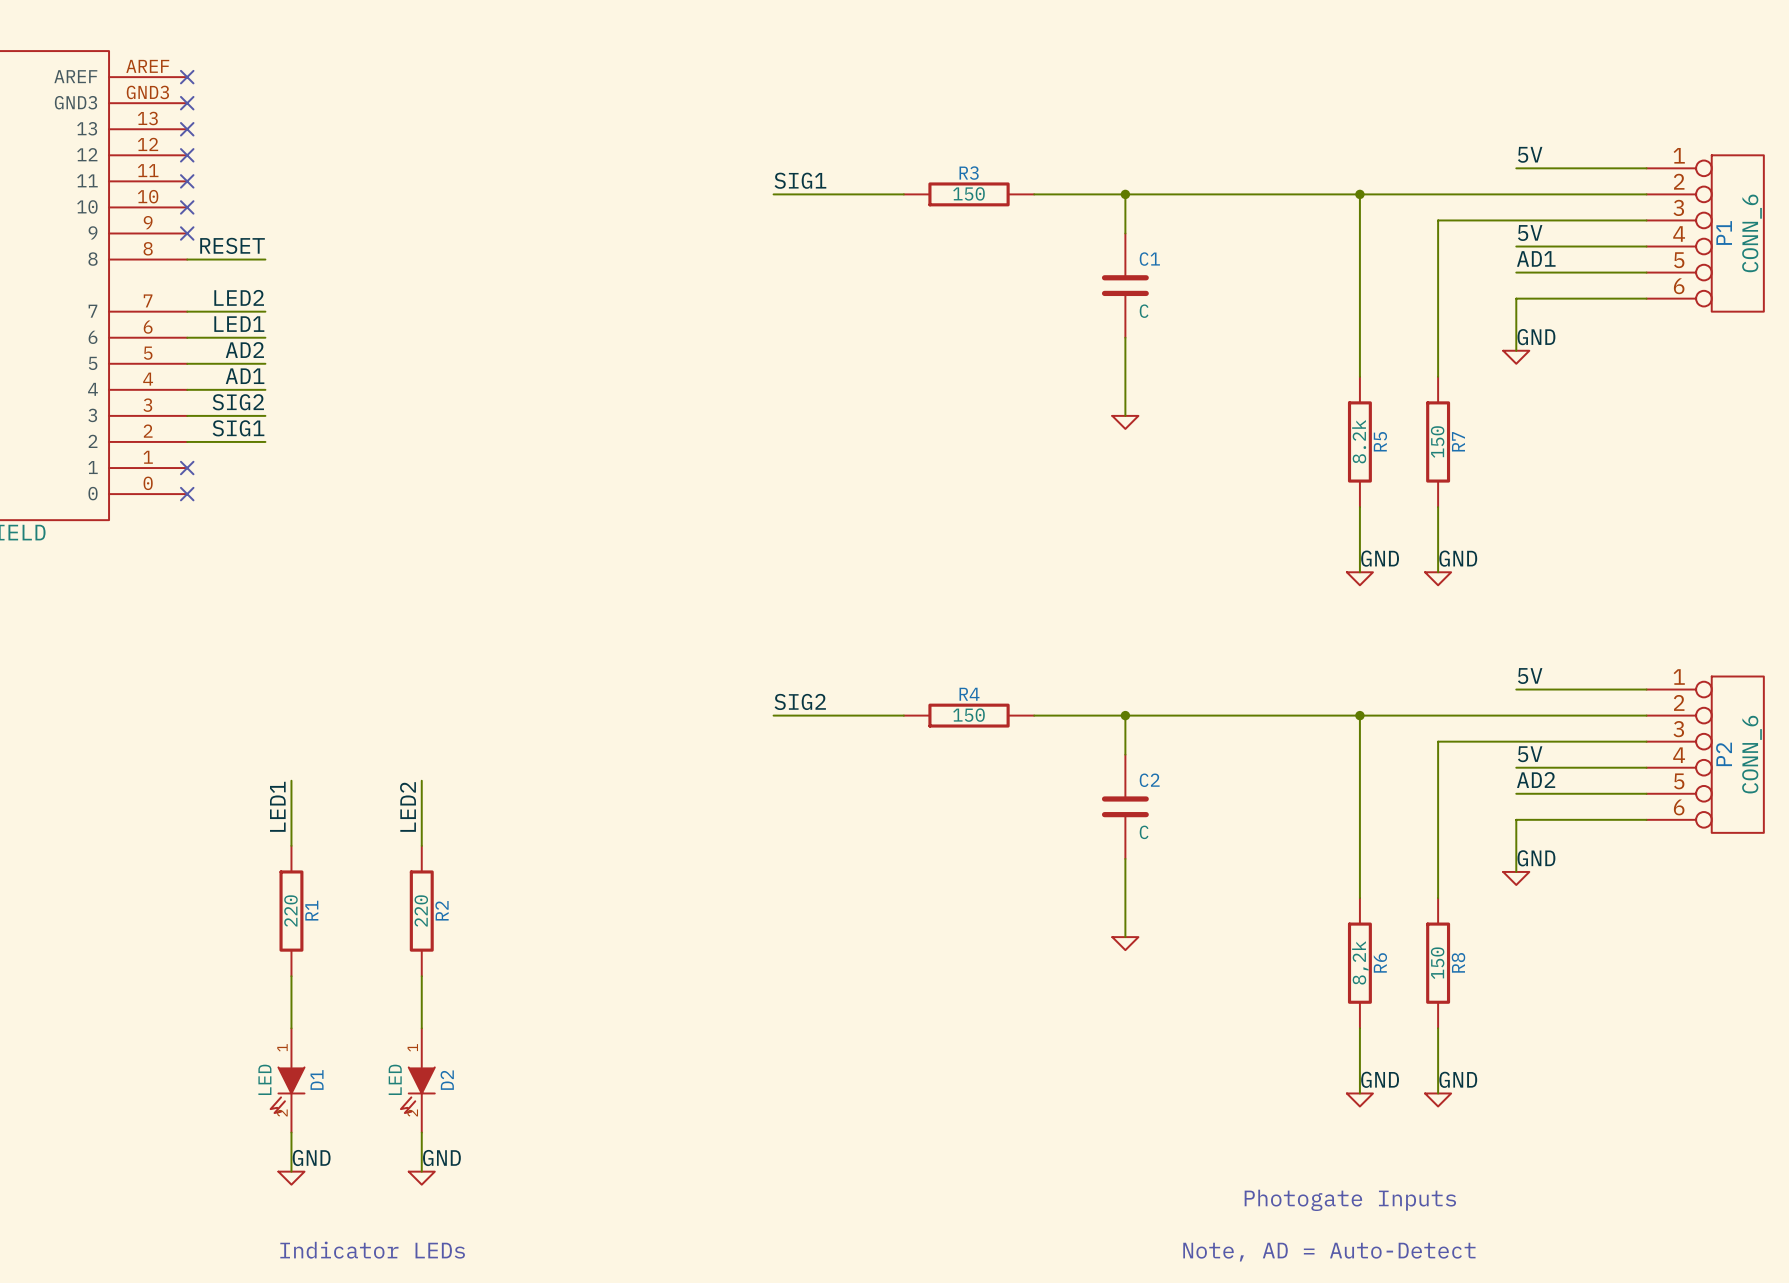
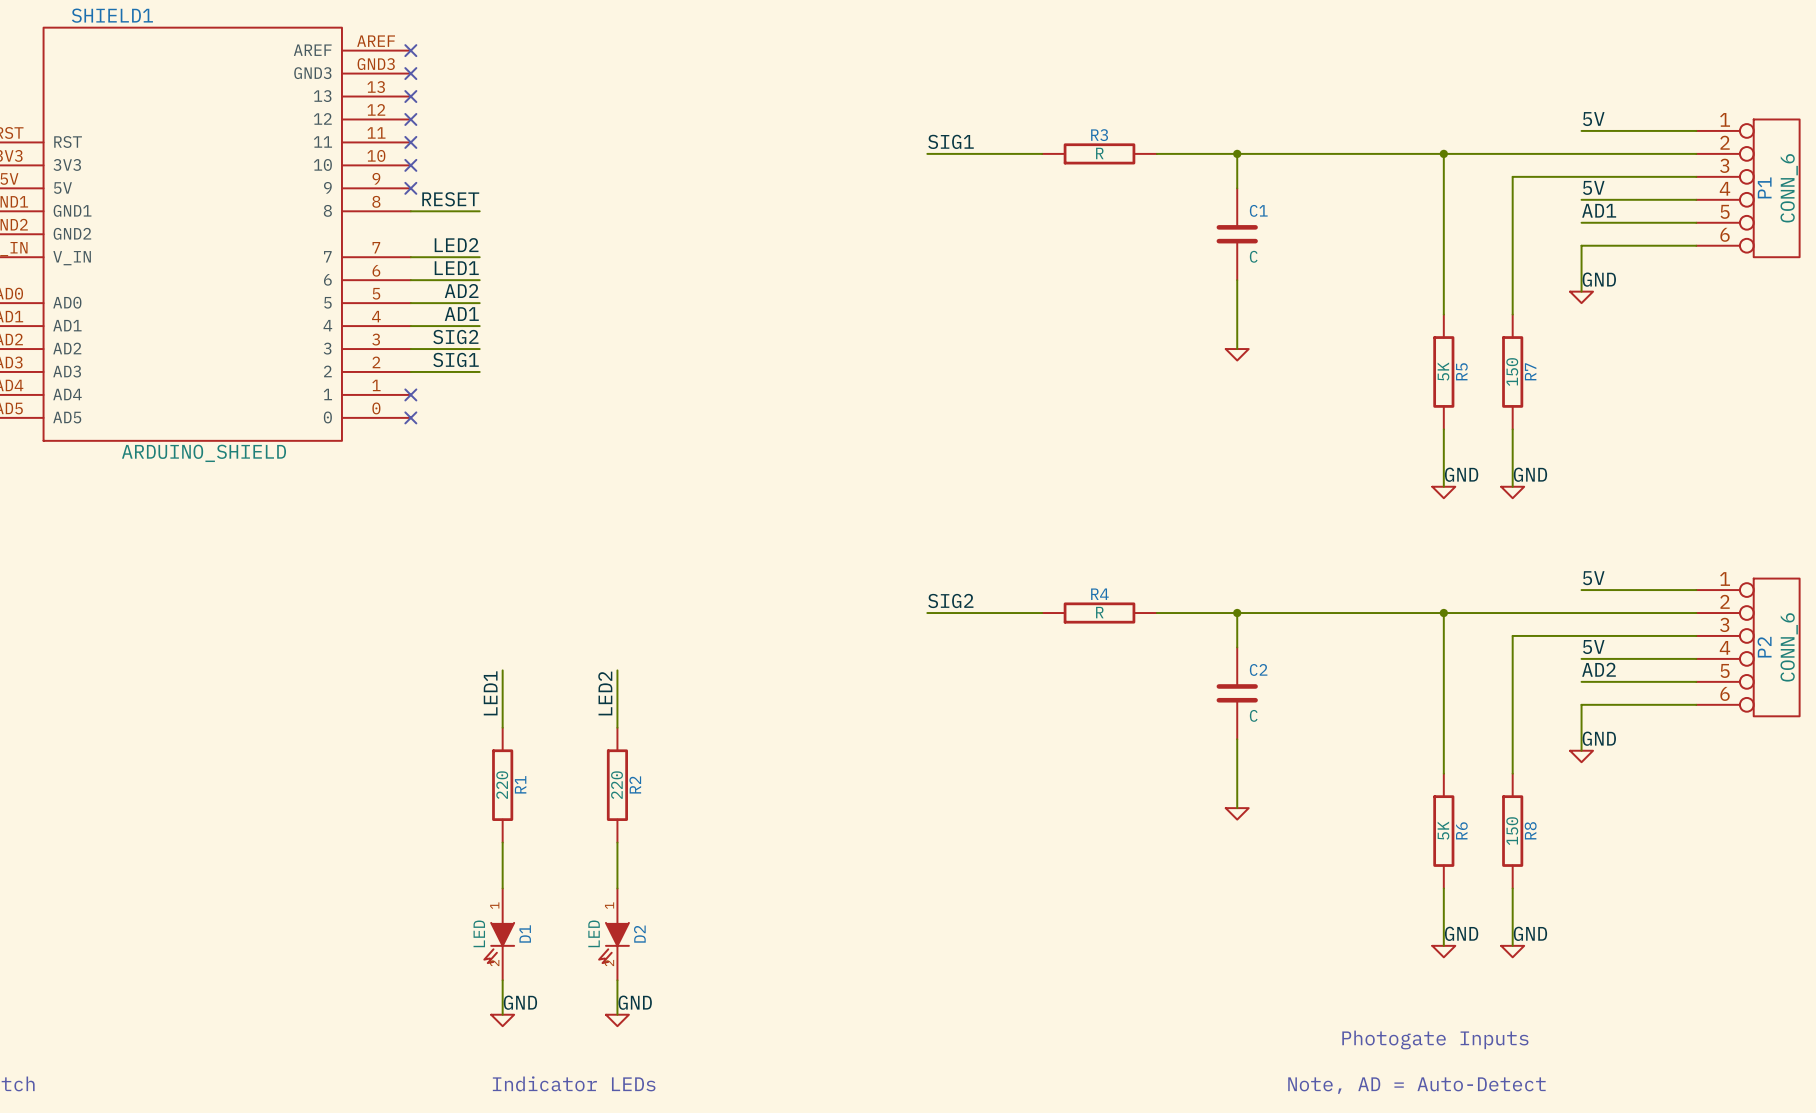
R3 value: 150 (969, 193) -> R (1099, 153)
R5 value: 8.2k (1359, 441) -> 5K (1443, 371)
R4 value: 150 (969, 715) -> R (1099, 612)
R6 value: 8,2k (1360, 962) -> 5K (1443, 830)

